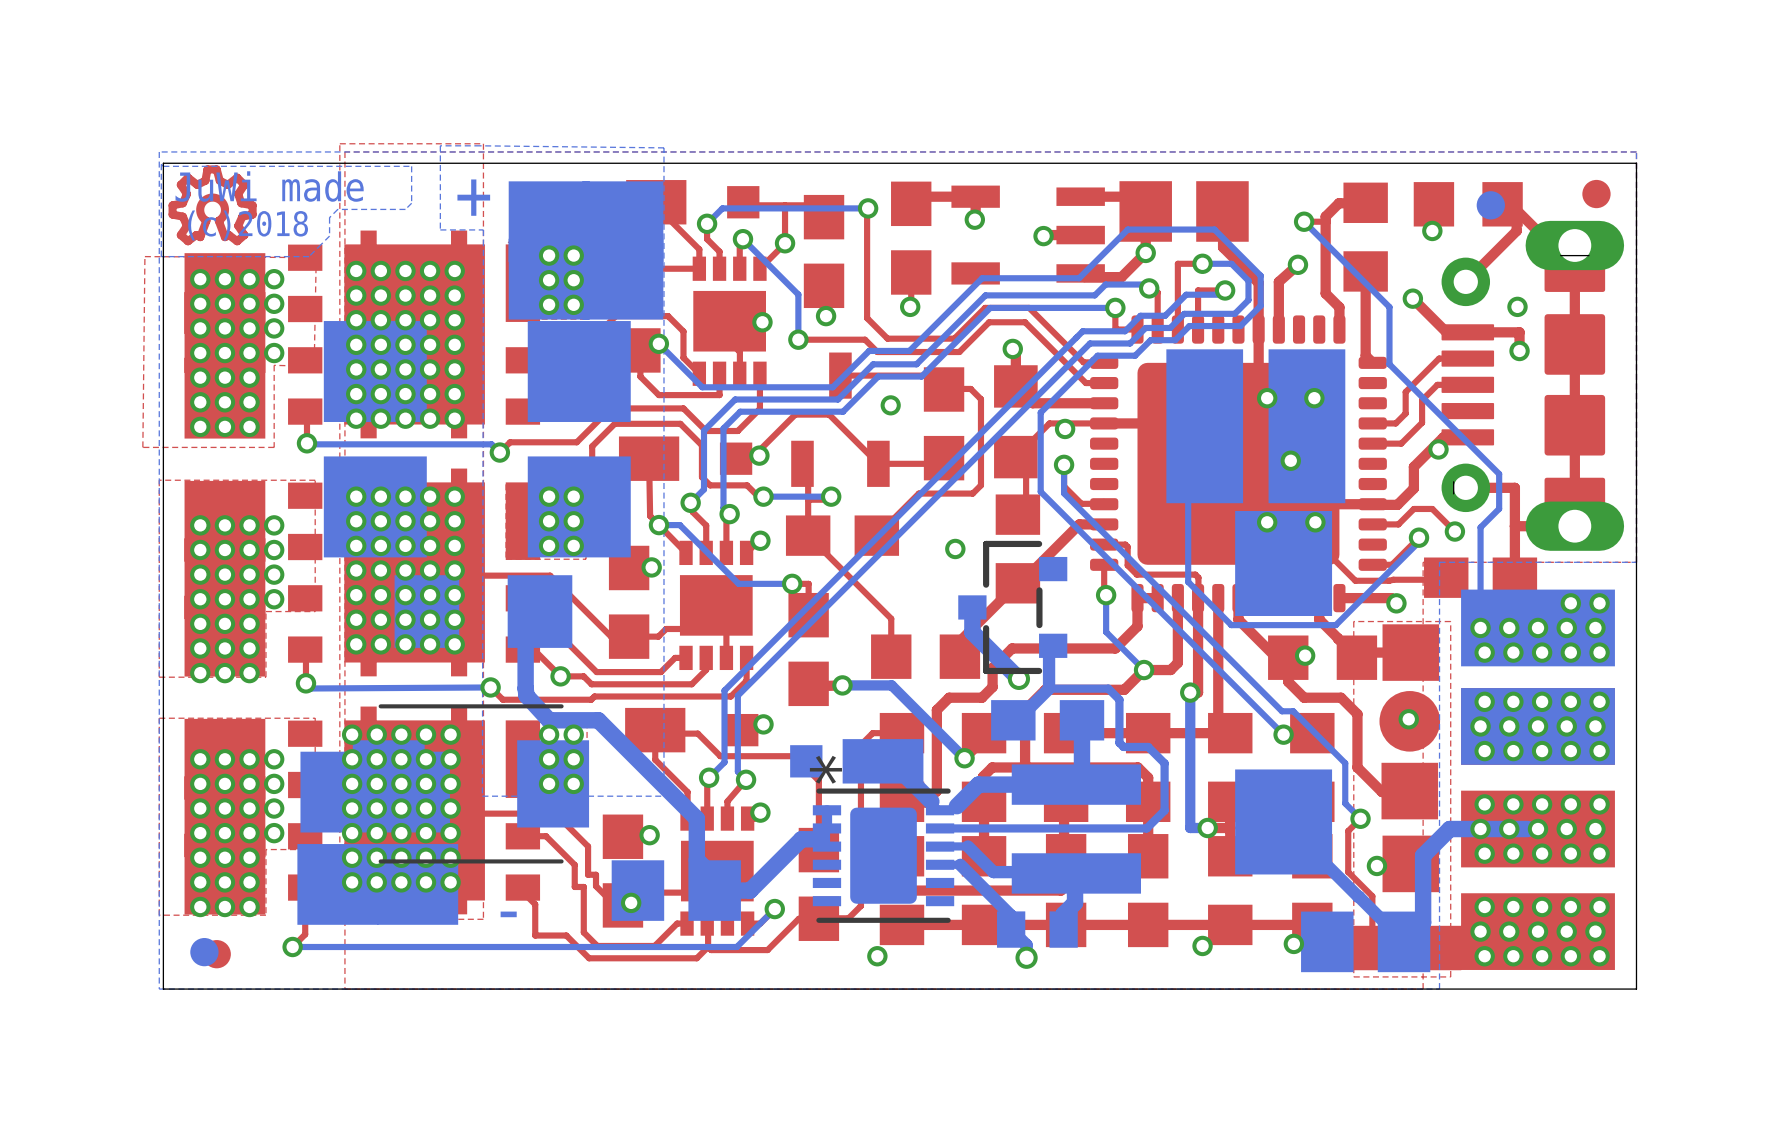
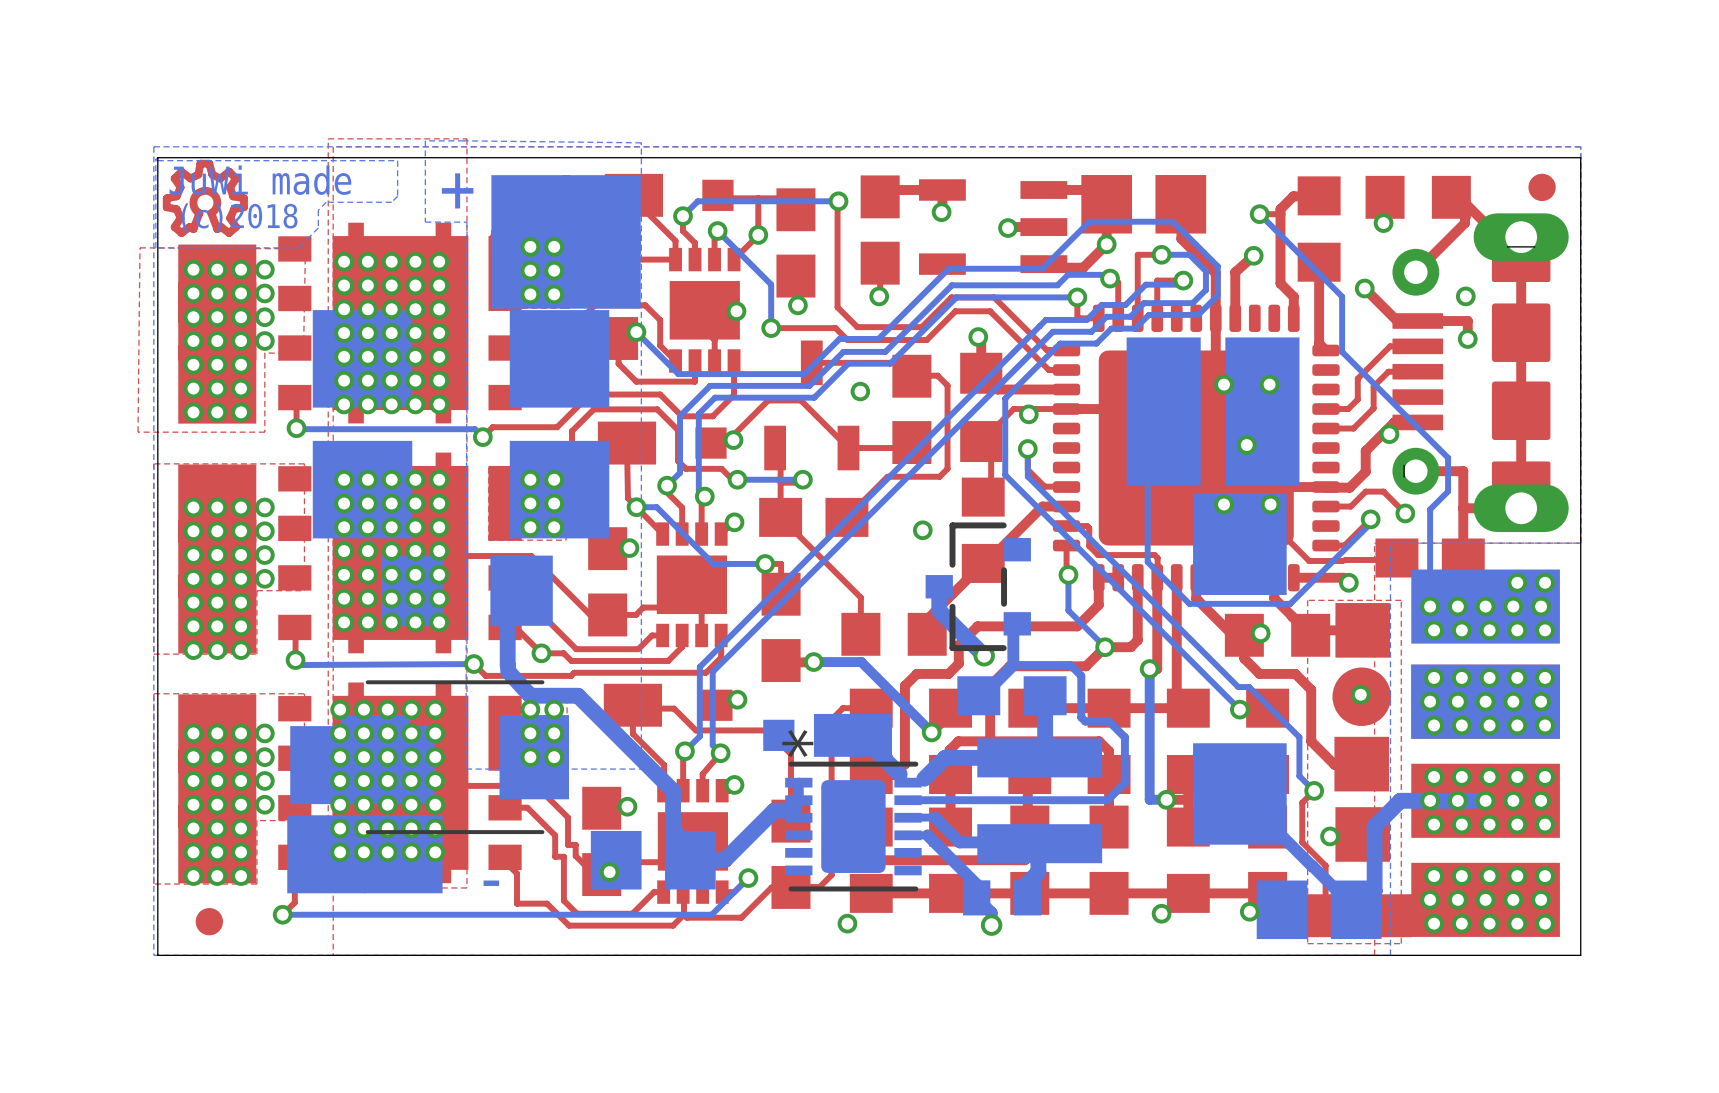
part: (1490, 205) -> none
part: (204, 952) -> none

